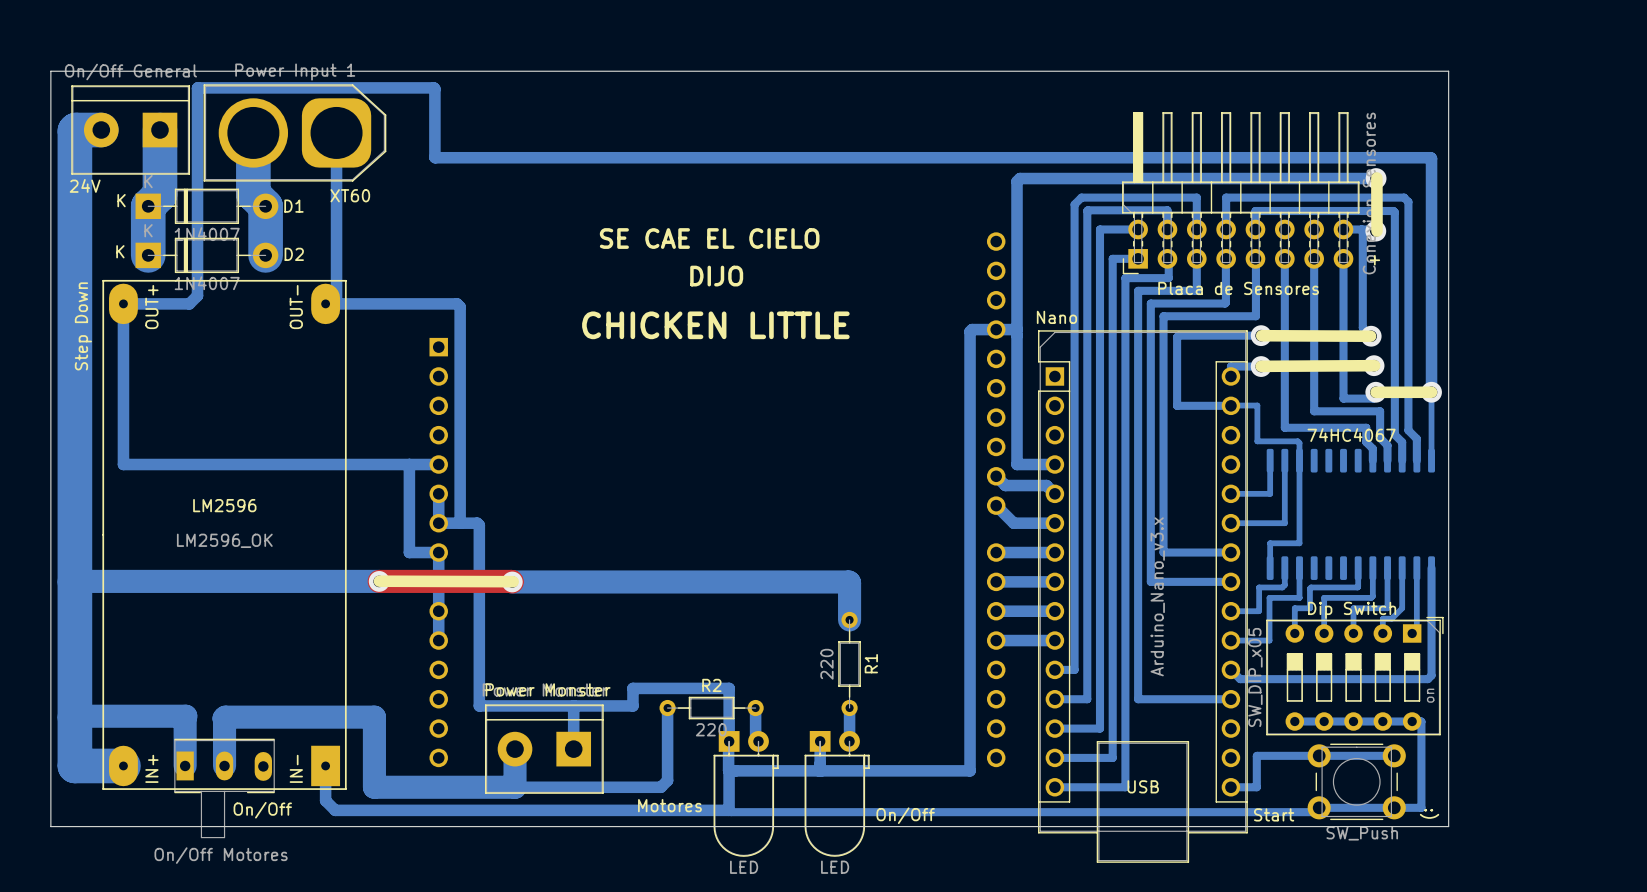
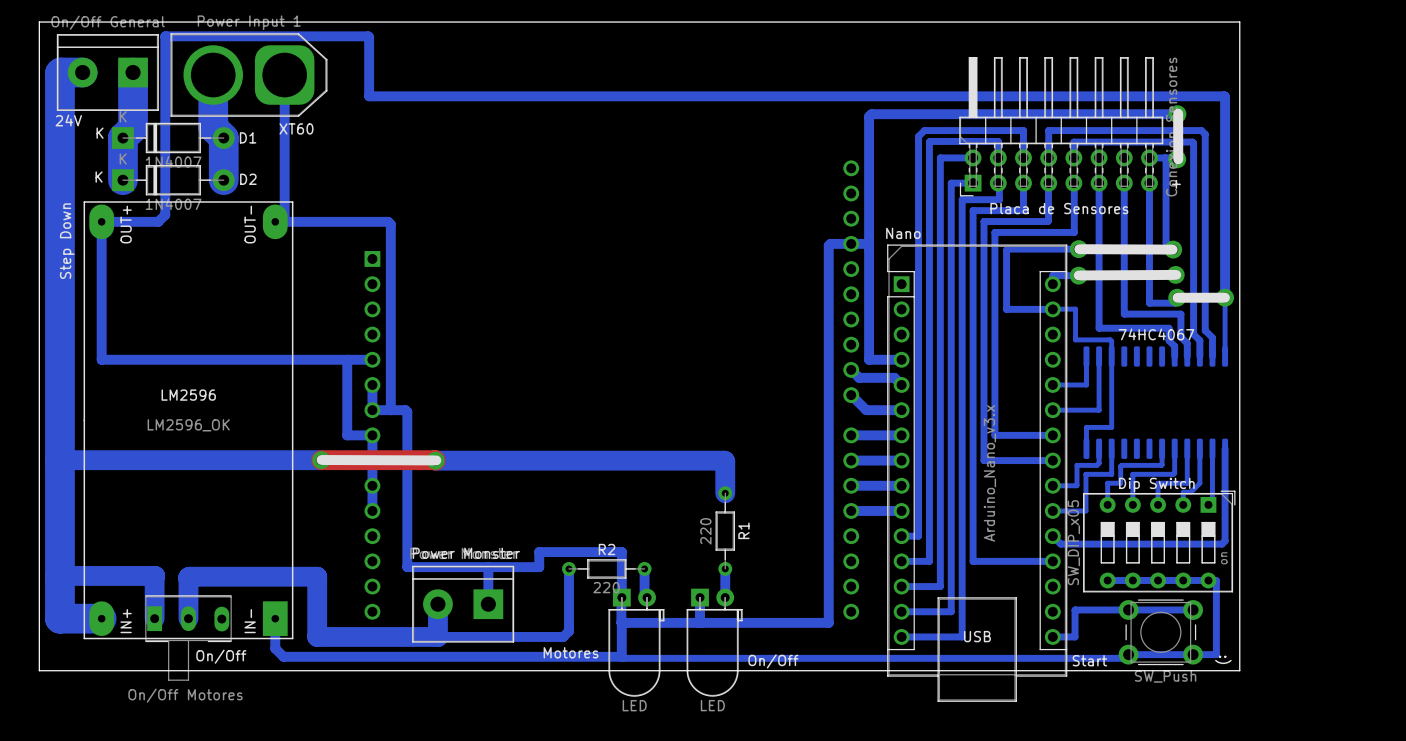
text: SE CAE EL CIELO (709, 238) -> none
text: DIJO (716, 276) -> none
text: CHICKEN LITTLE (715, 325) -> none

